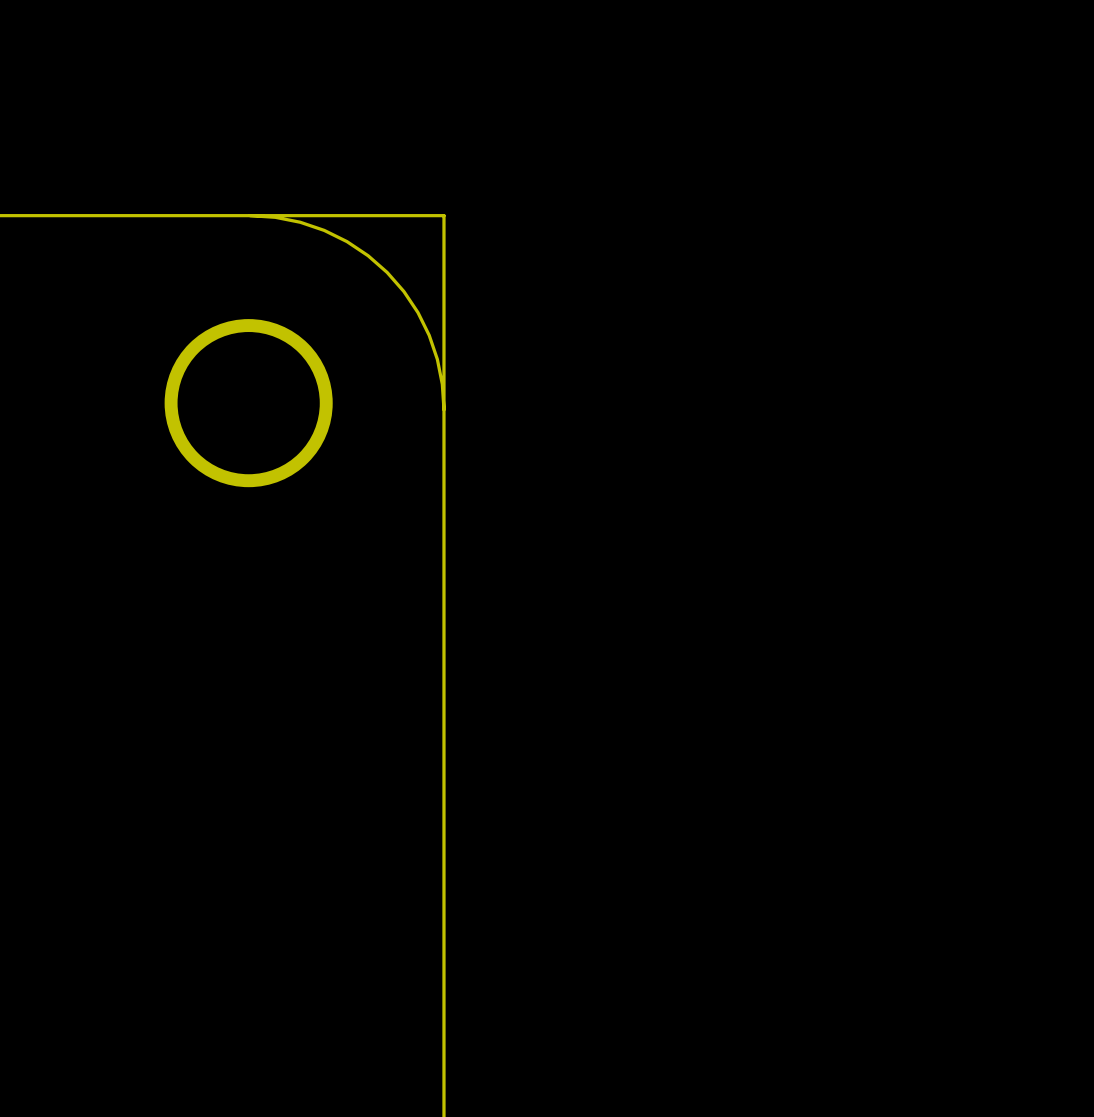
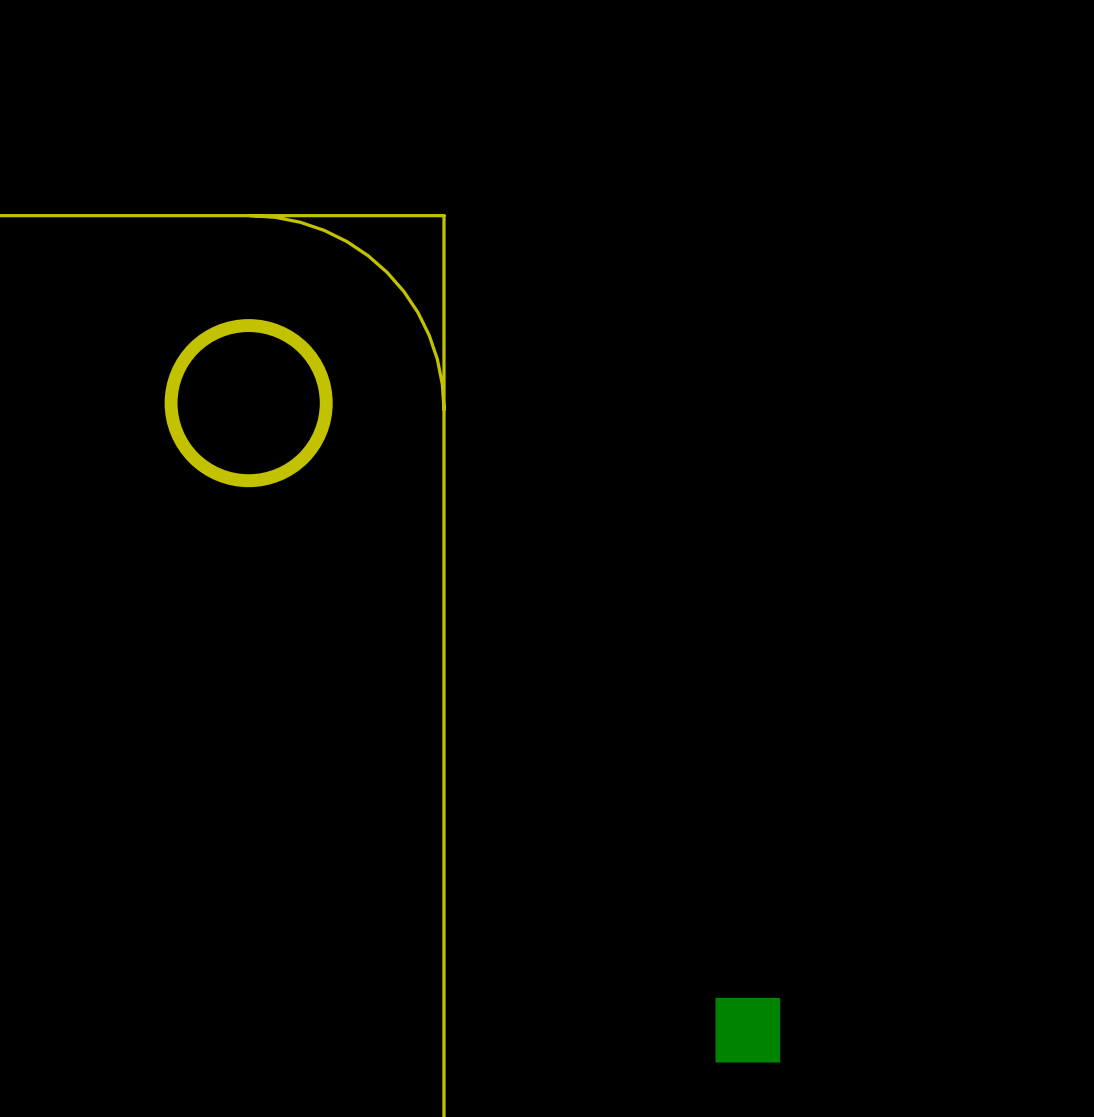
part: none -> (747, 1030)

